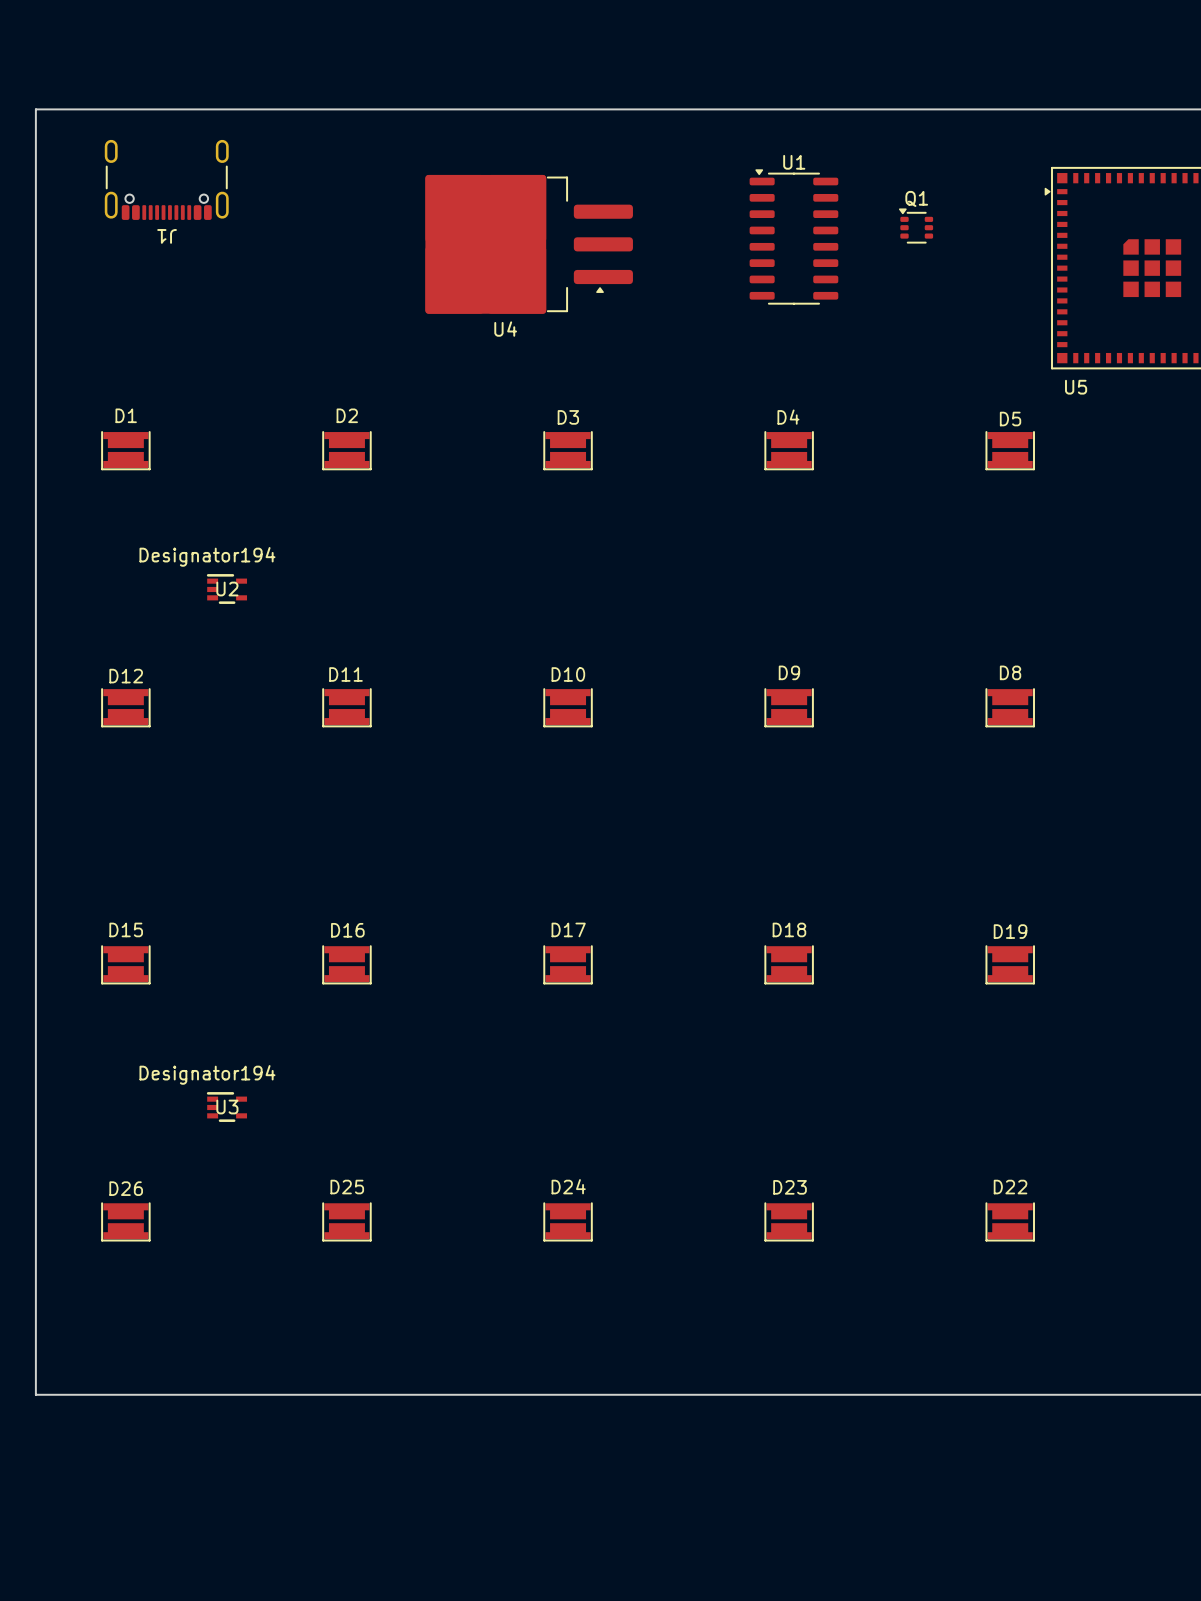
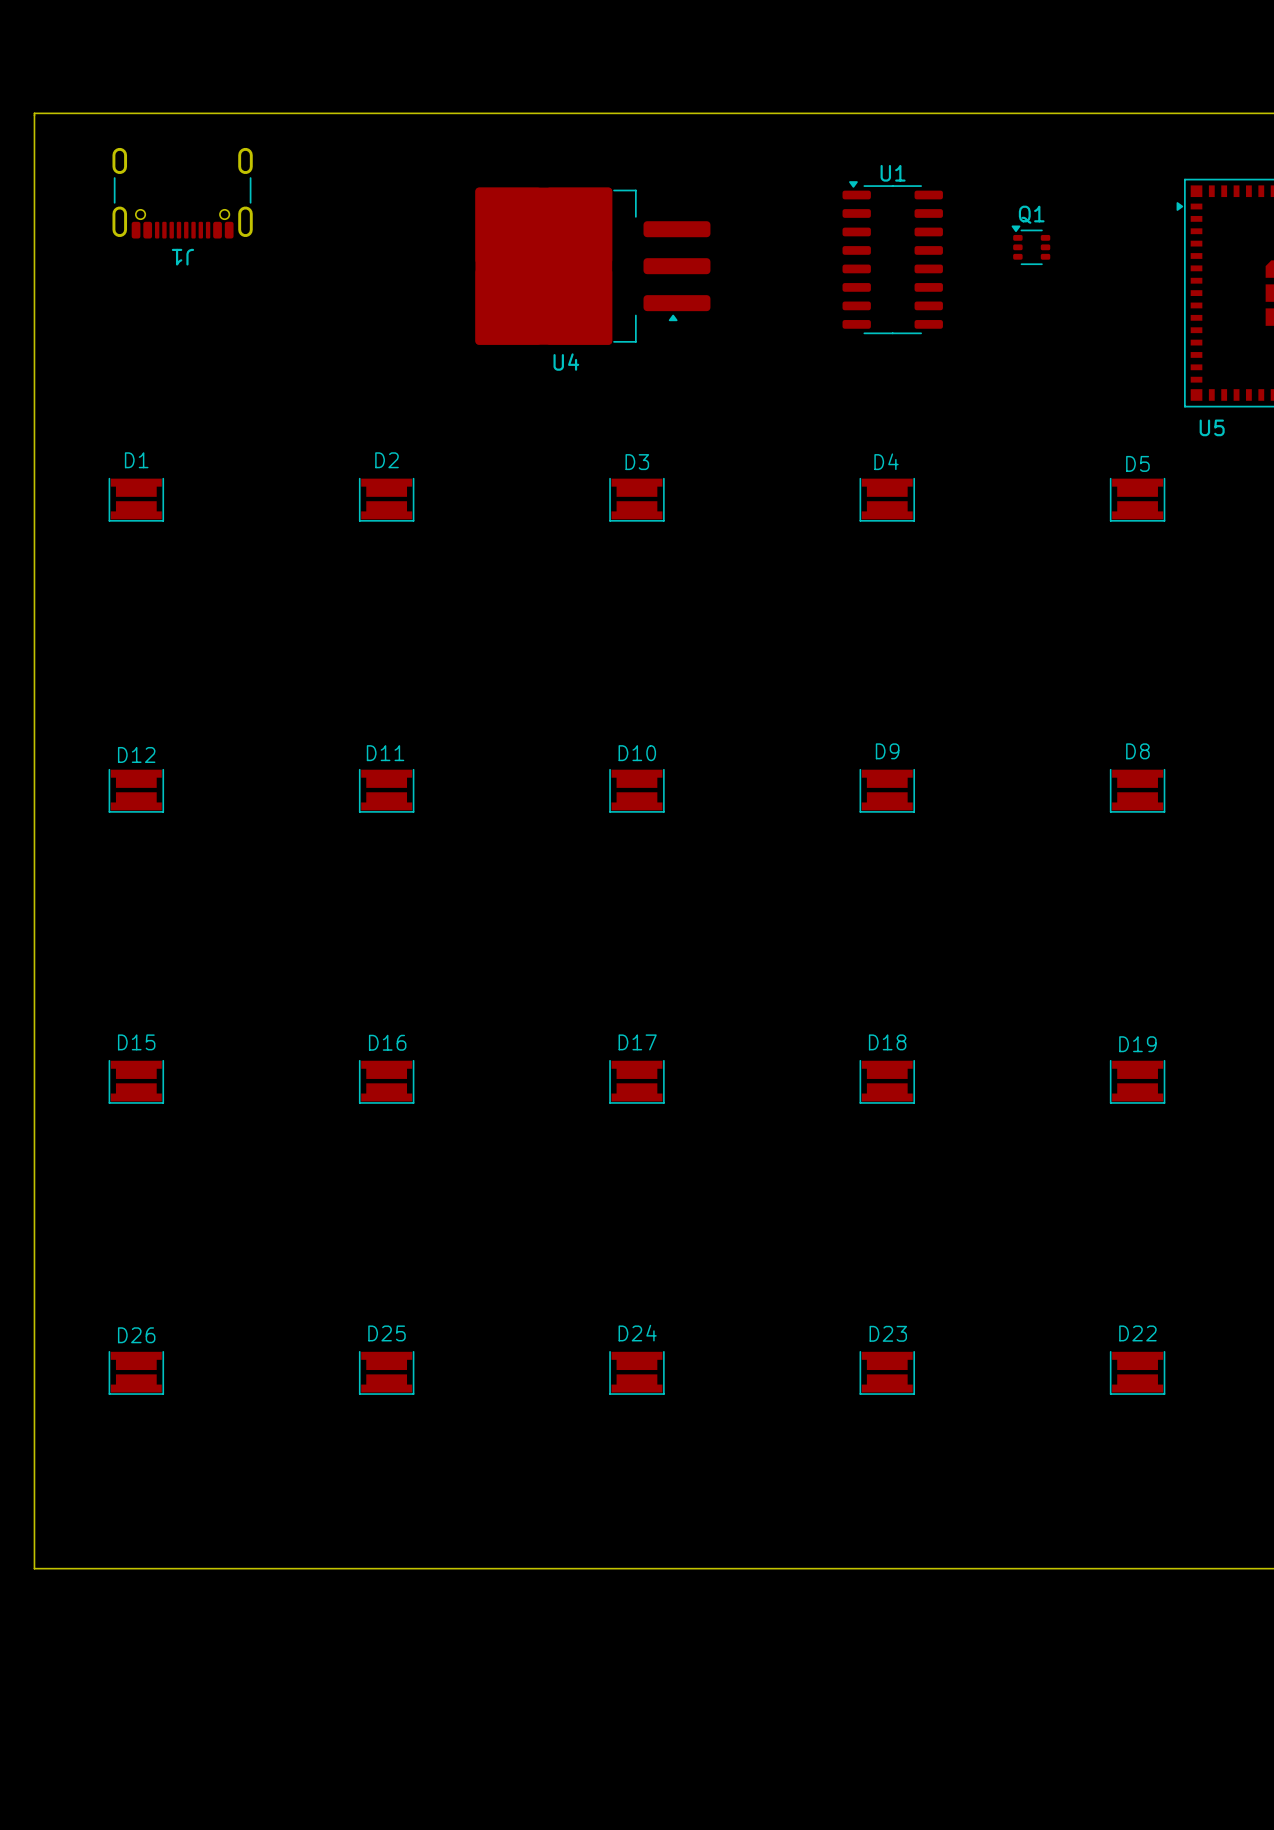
U2: (226, 589) -> none
U3: (226, 1107) -> none

